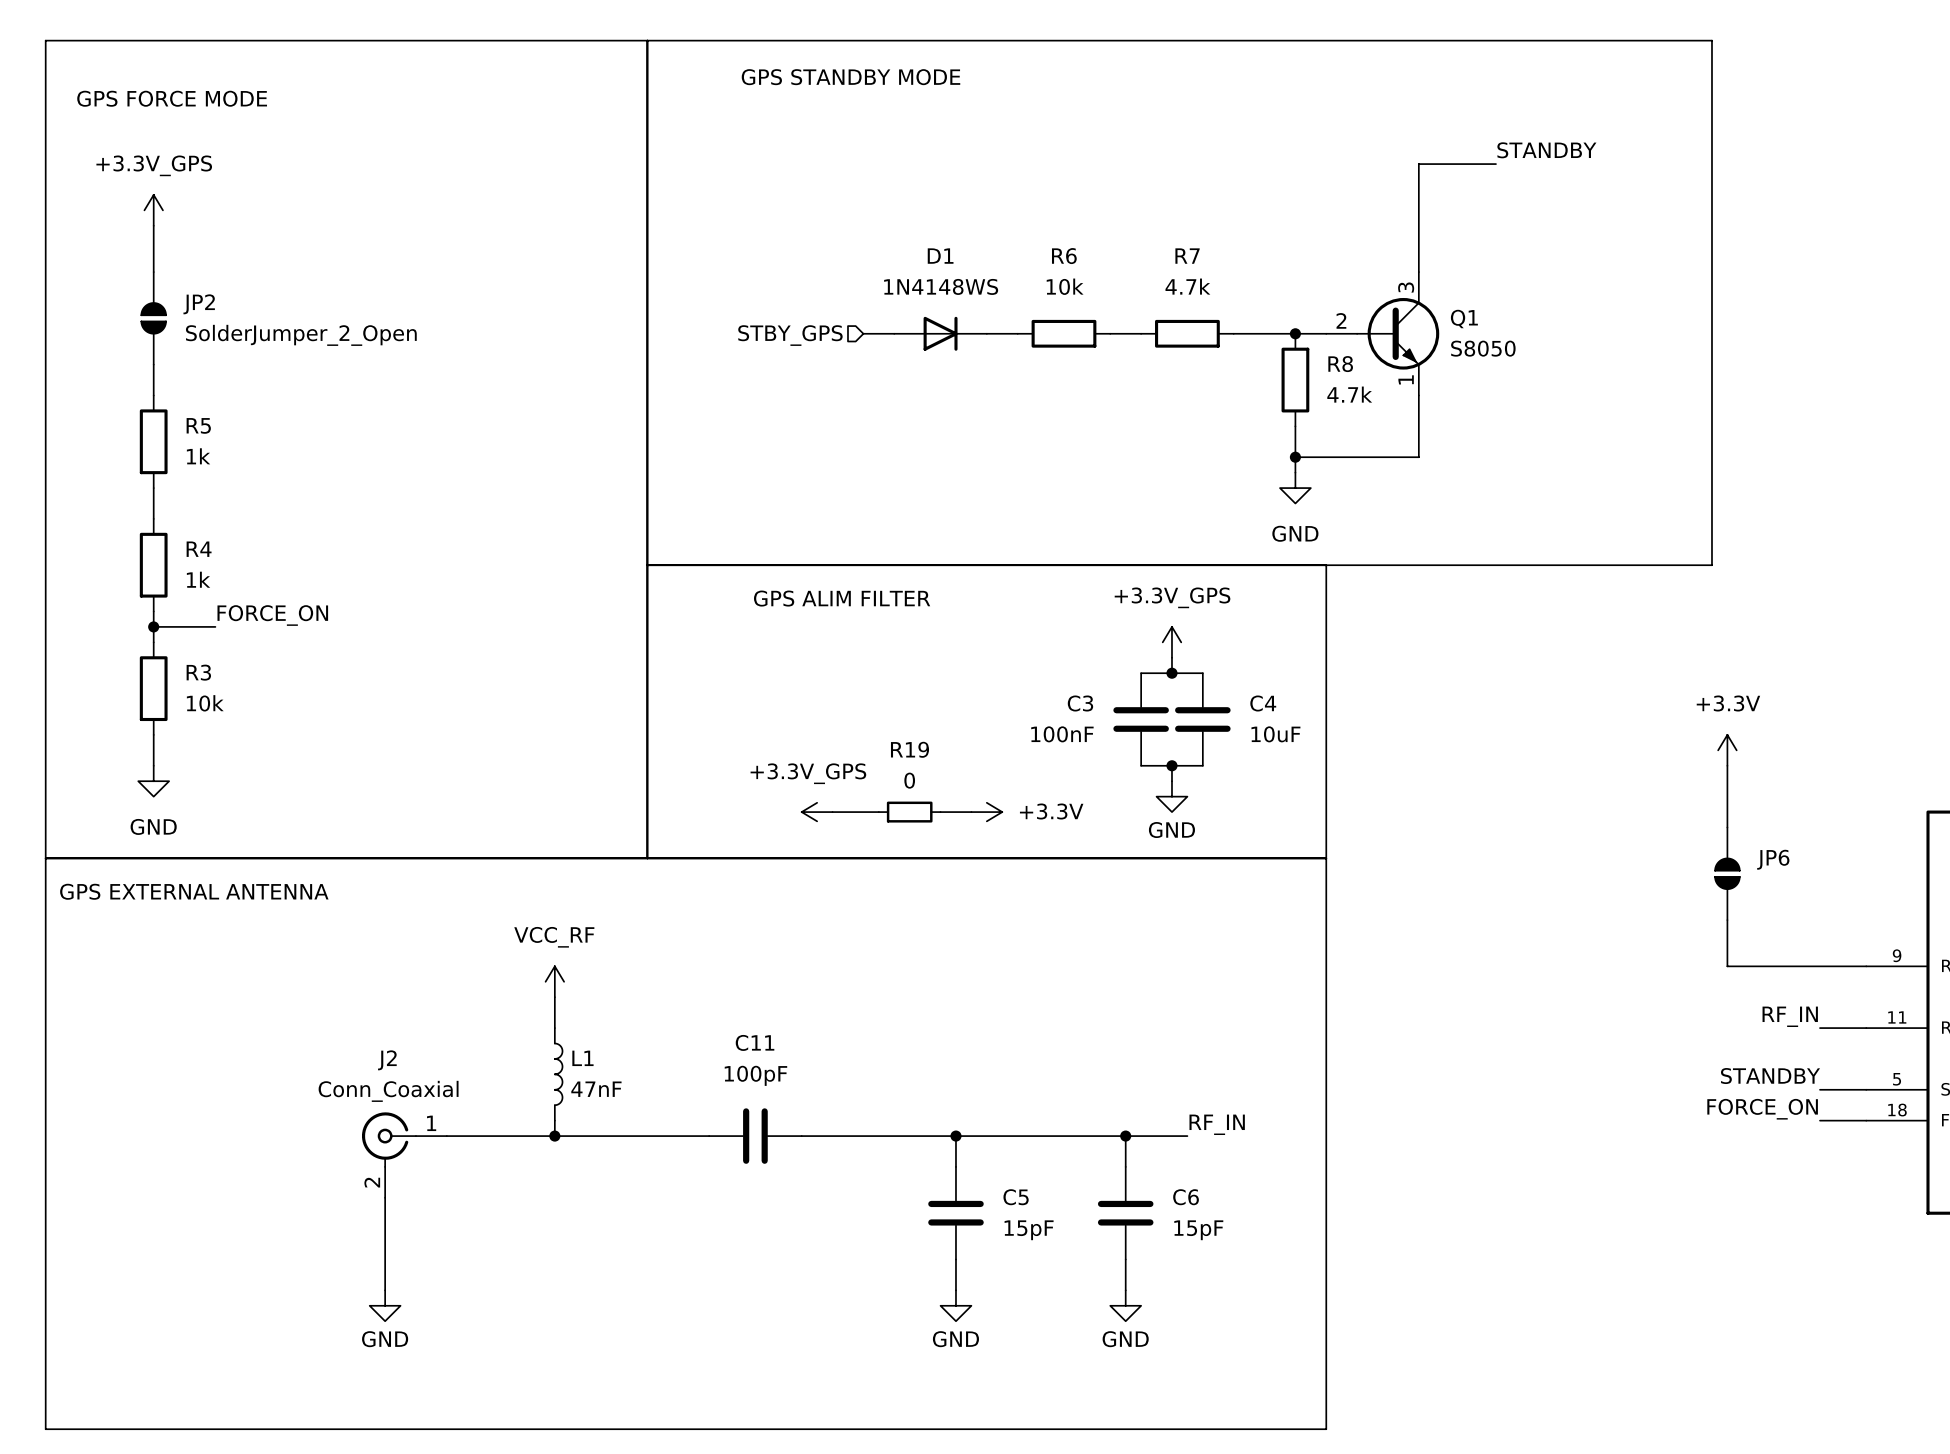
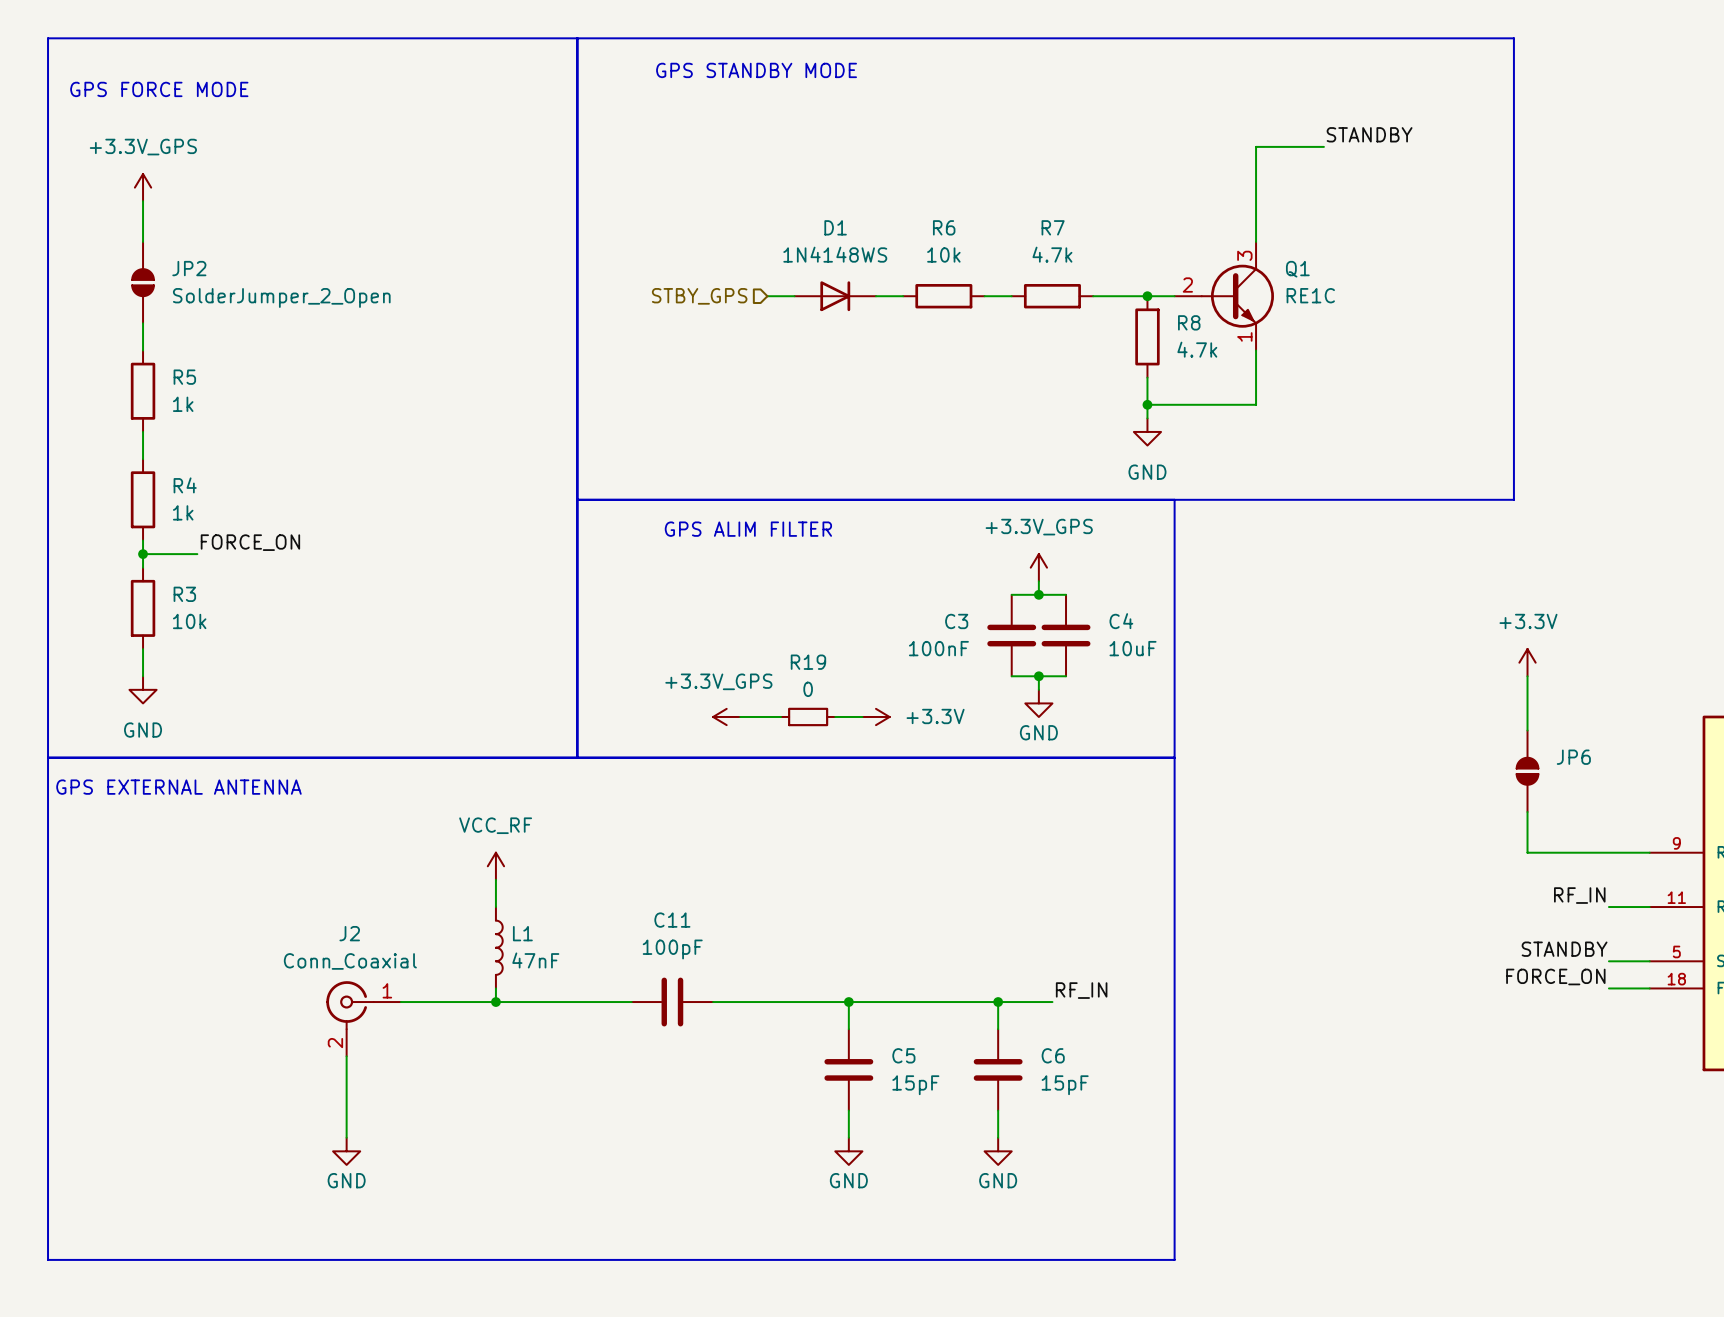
Q1 name position: Q1 (1464, 319) -> Q1 (1297, 269)
Q1 value: S8050 (1483, 348) -> RE1C (1310, 295)

